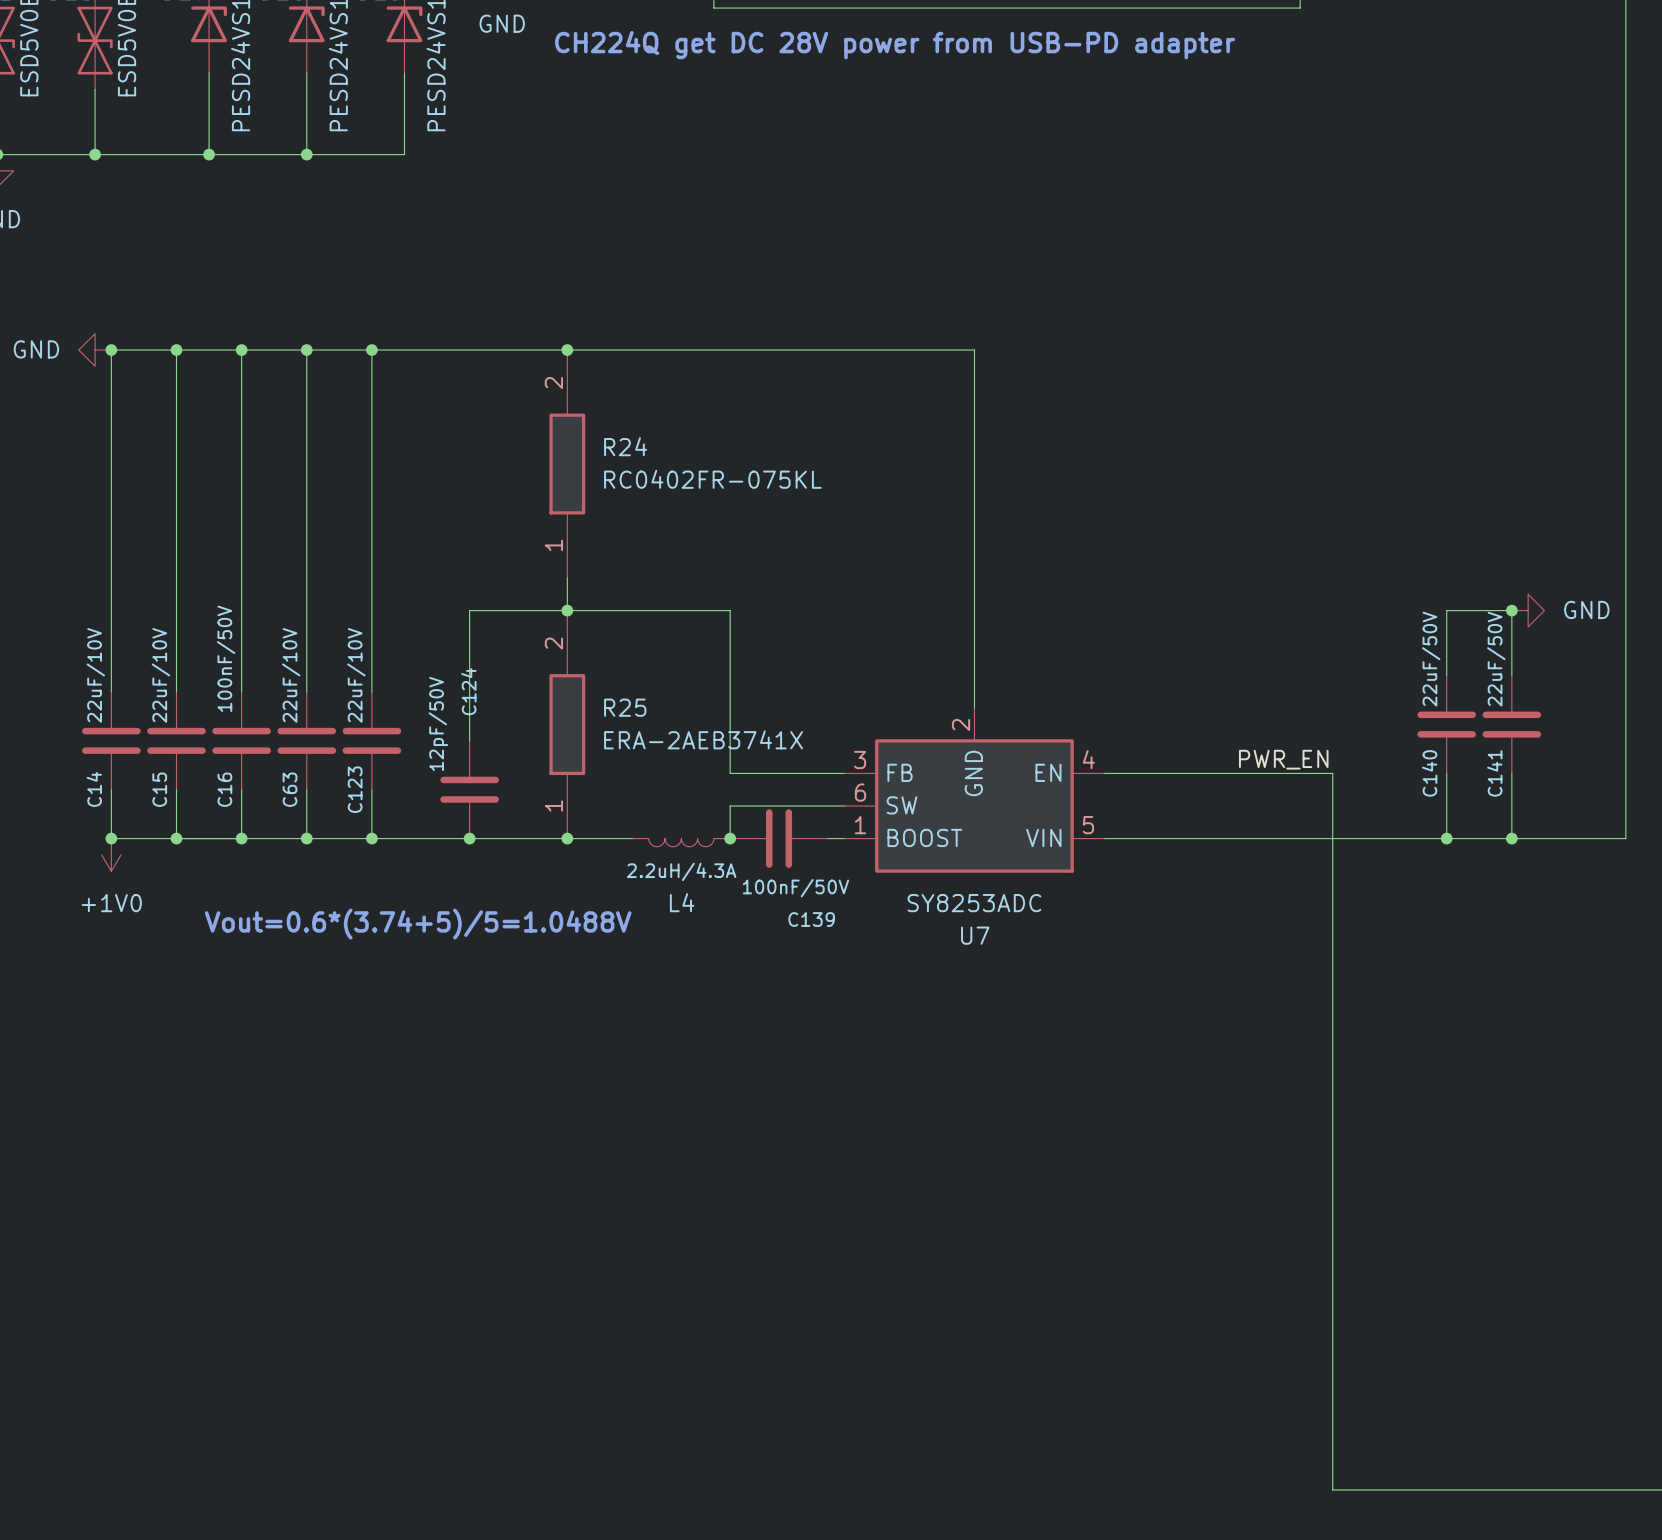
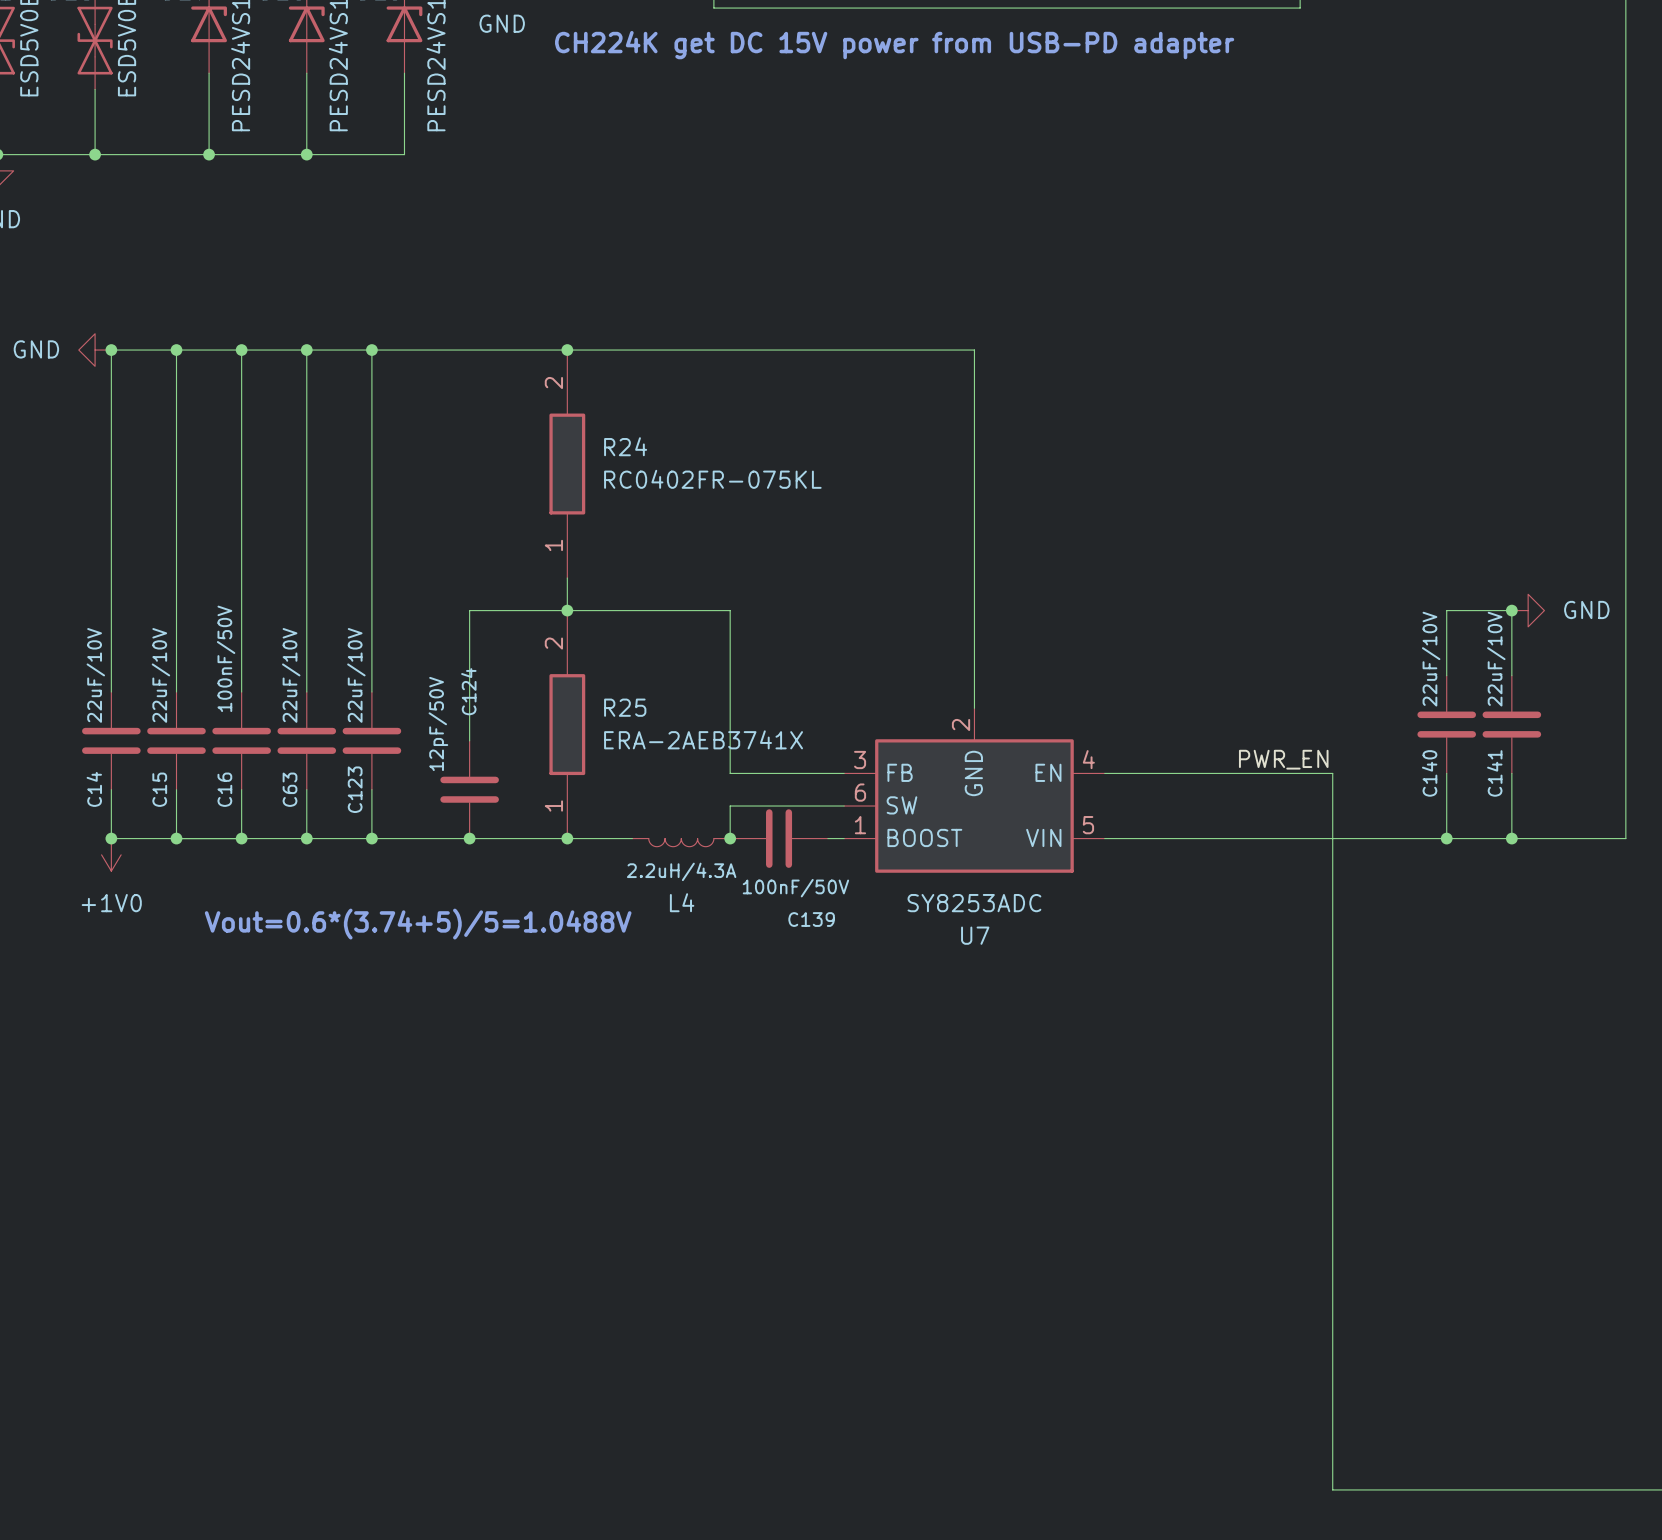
text: CH224Q get DC 28V power from USB-PD adapter (895, 45) -> CH224K get DC 15V power from USB-PD adapter (894, 45)
C140 value: 22uF/50V (1431, 659) -> 22uF/10V (1431, 659)
C141 value: 22uF/50V (1496, 659) -> 22uF/10V (1496, 659)

